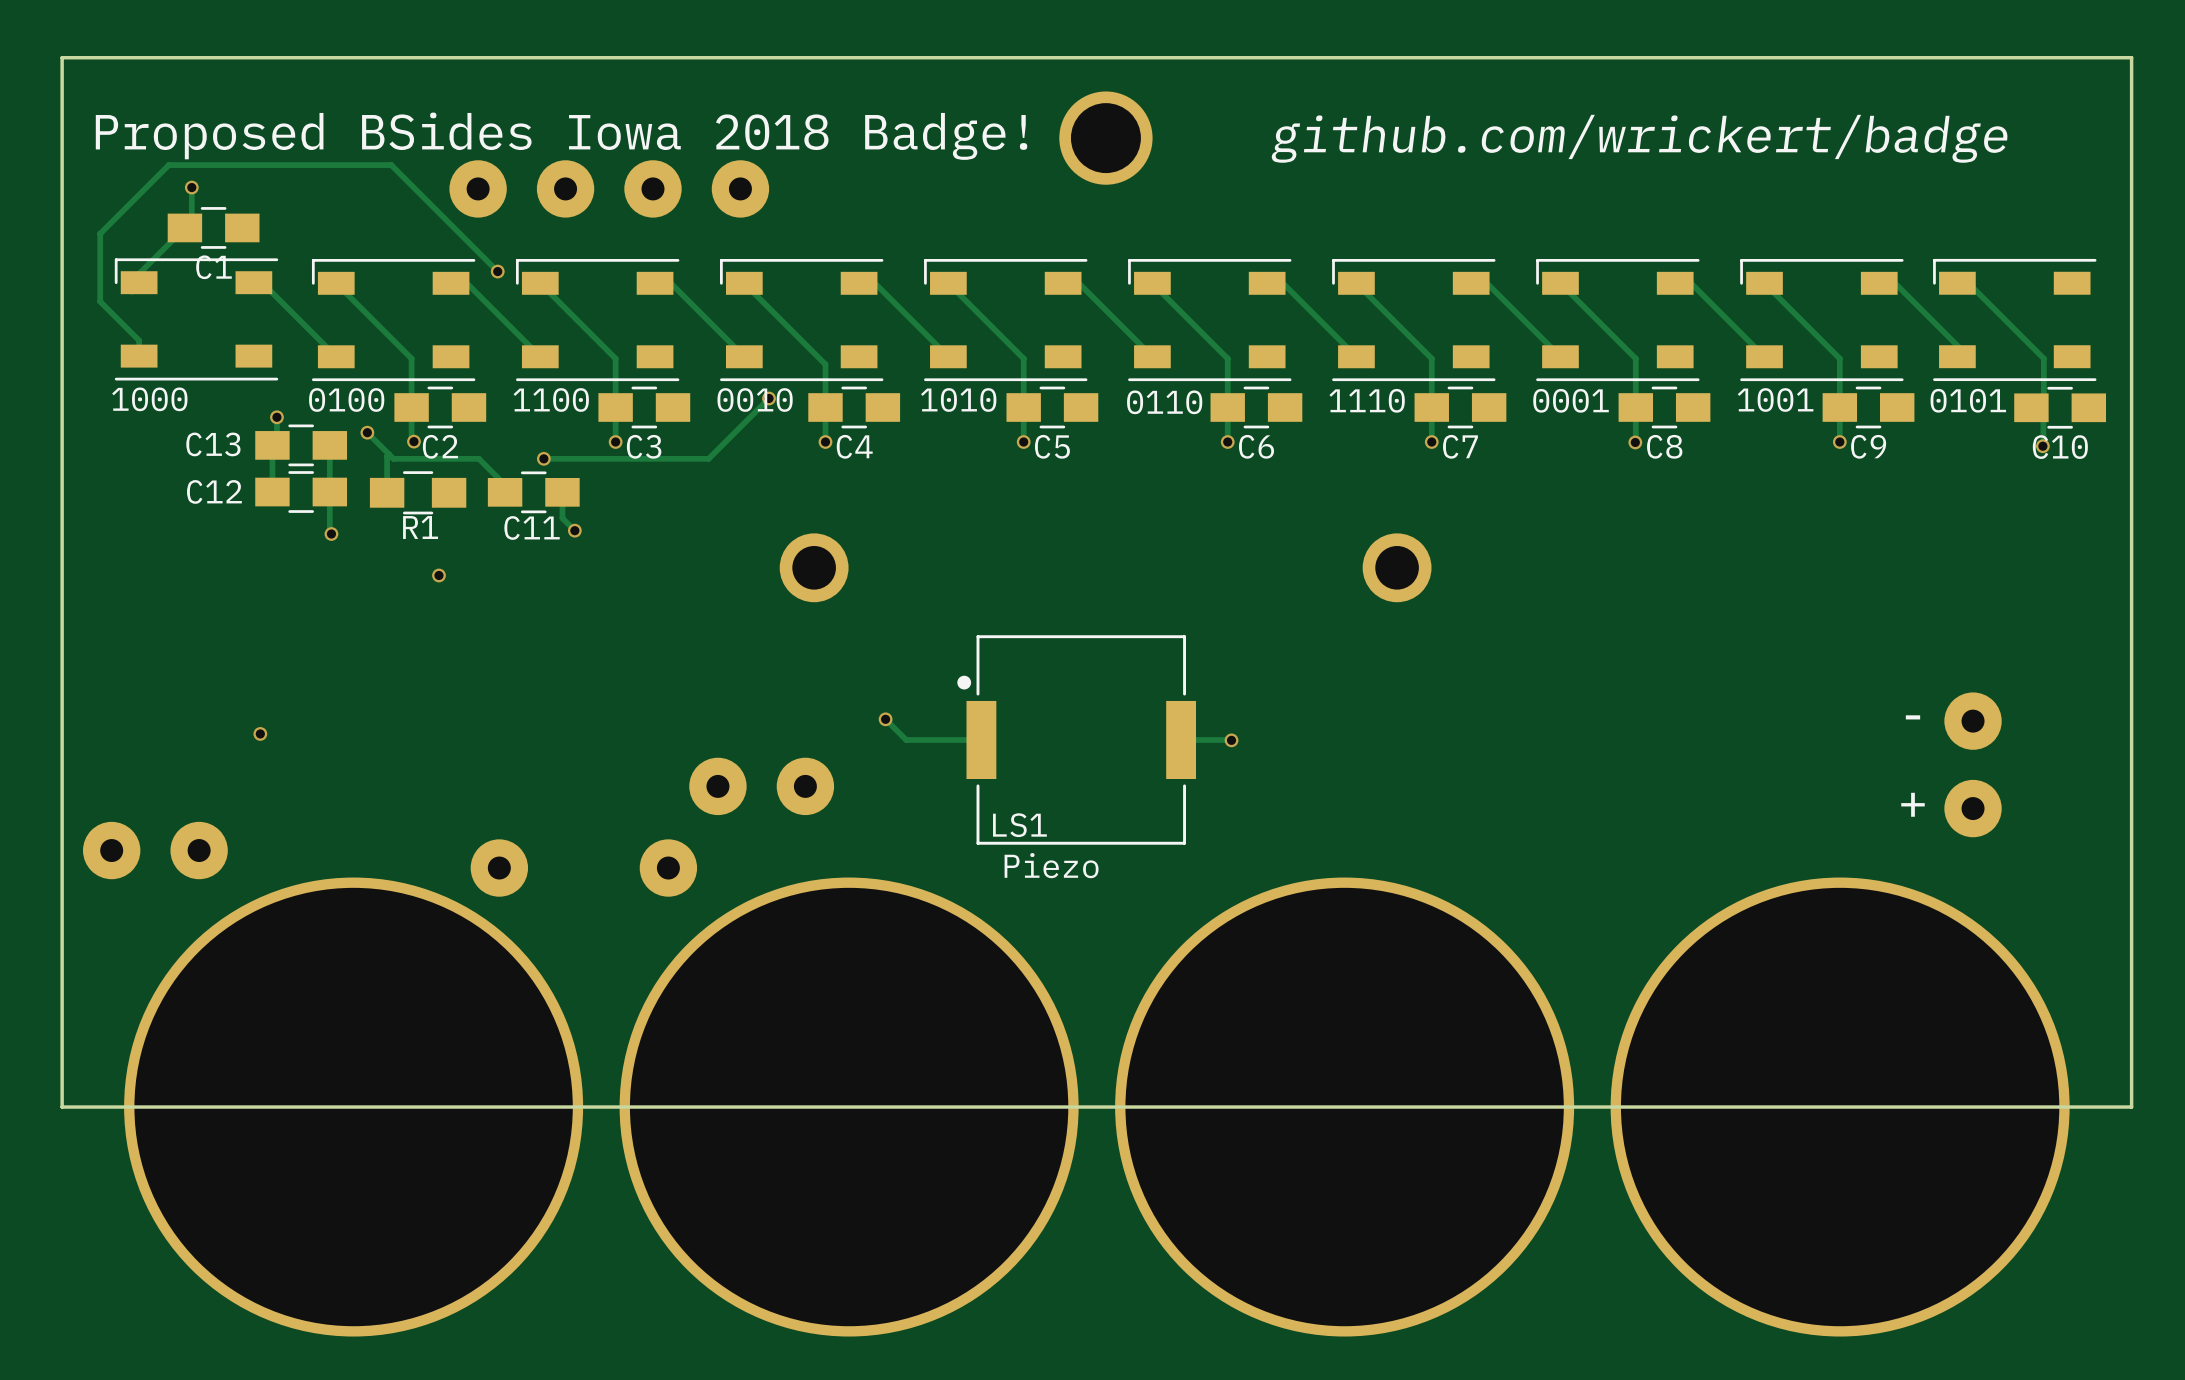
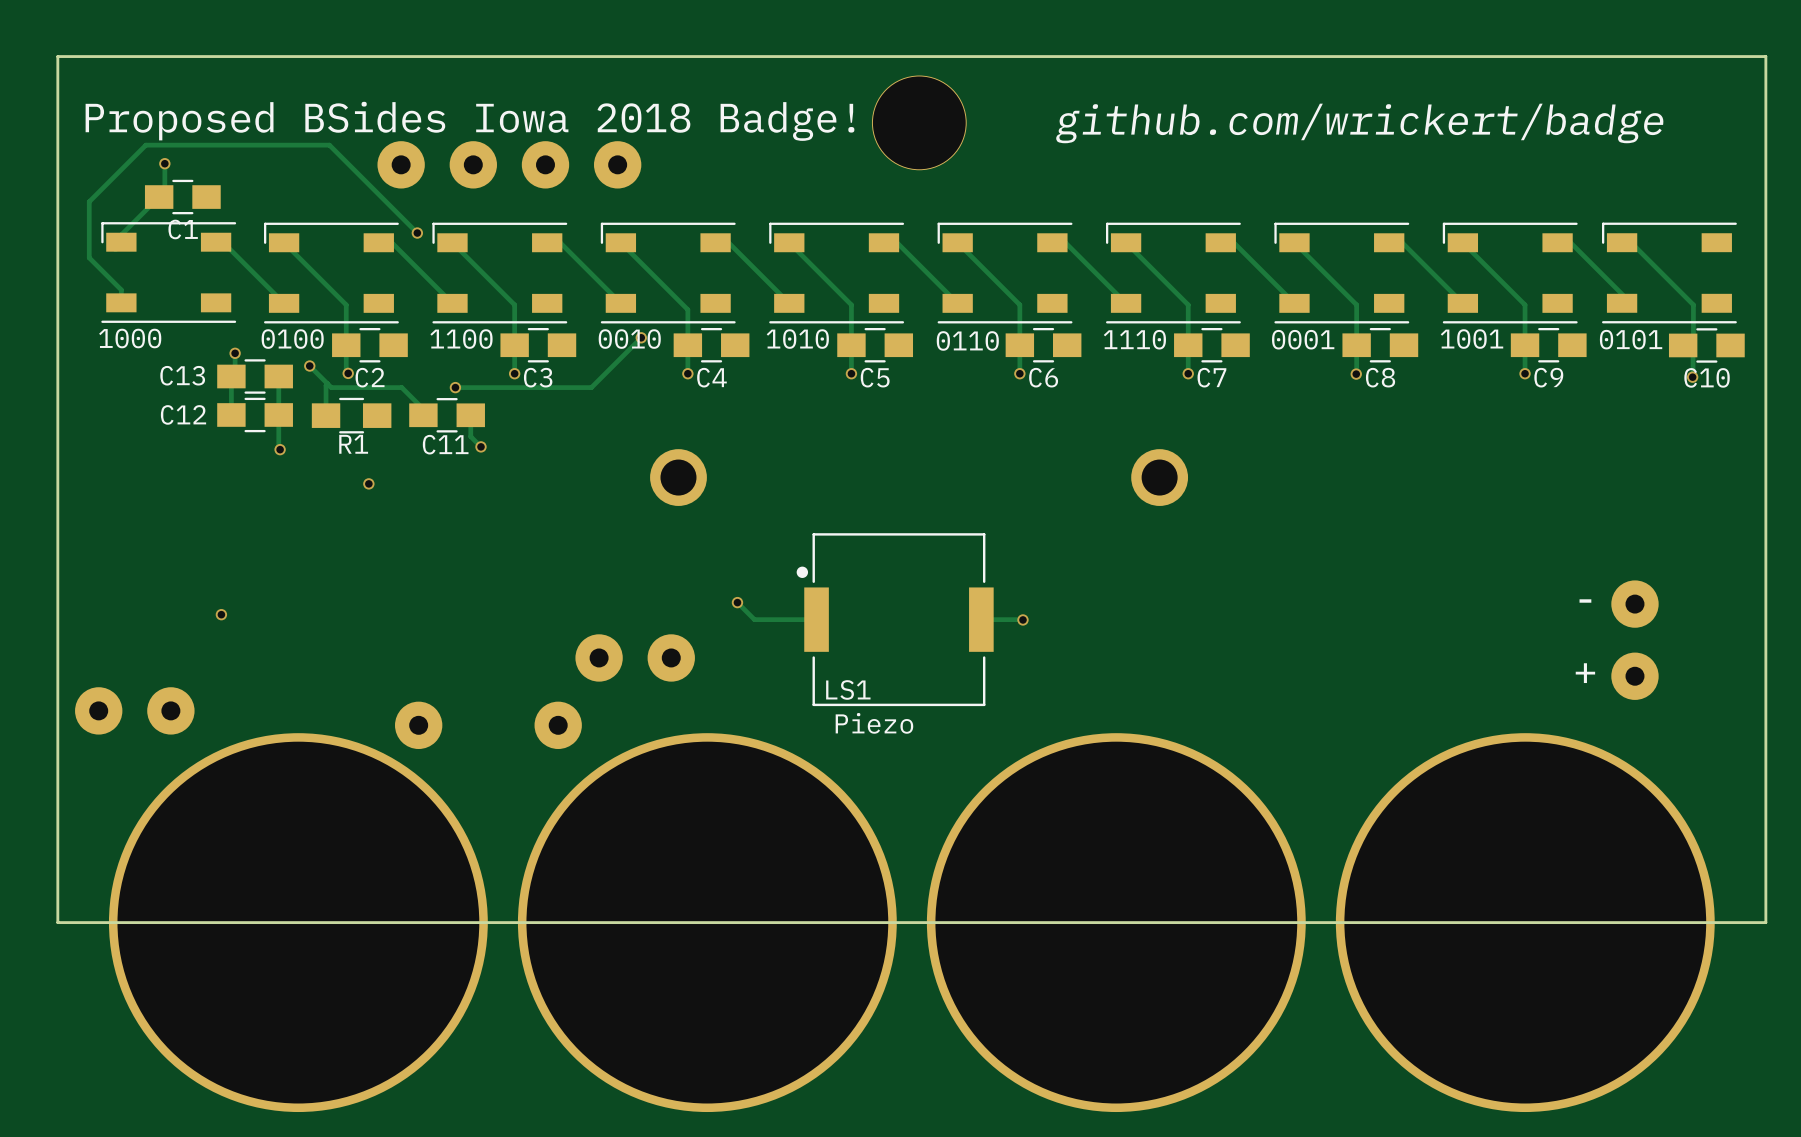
part footprint: [1059, 91, 1153, 185] -> [871, 75, 967, 171]

